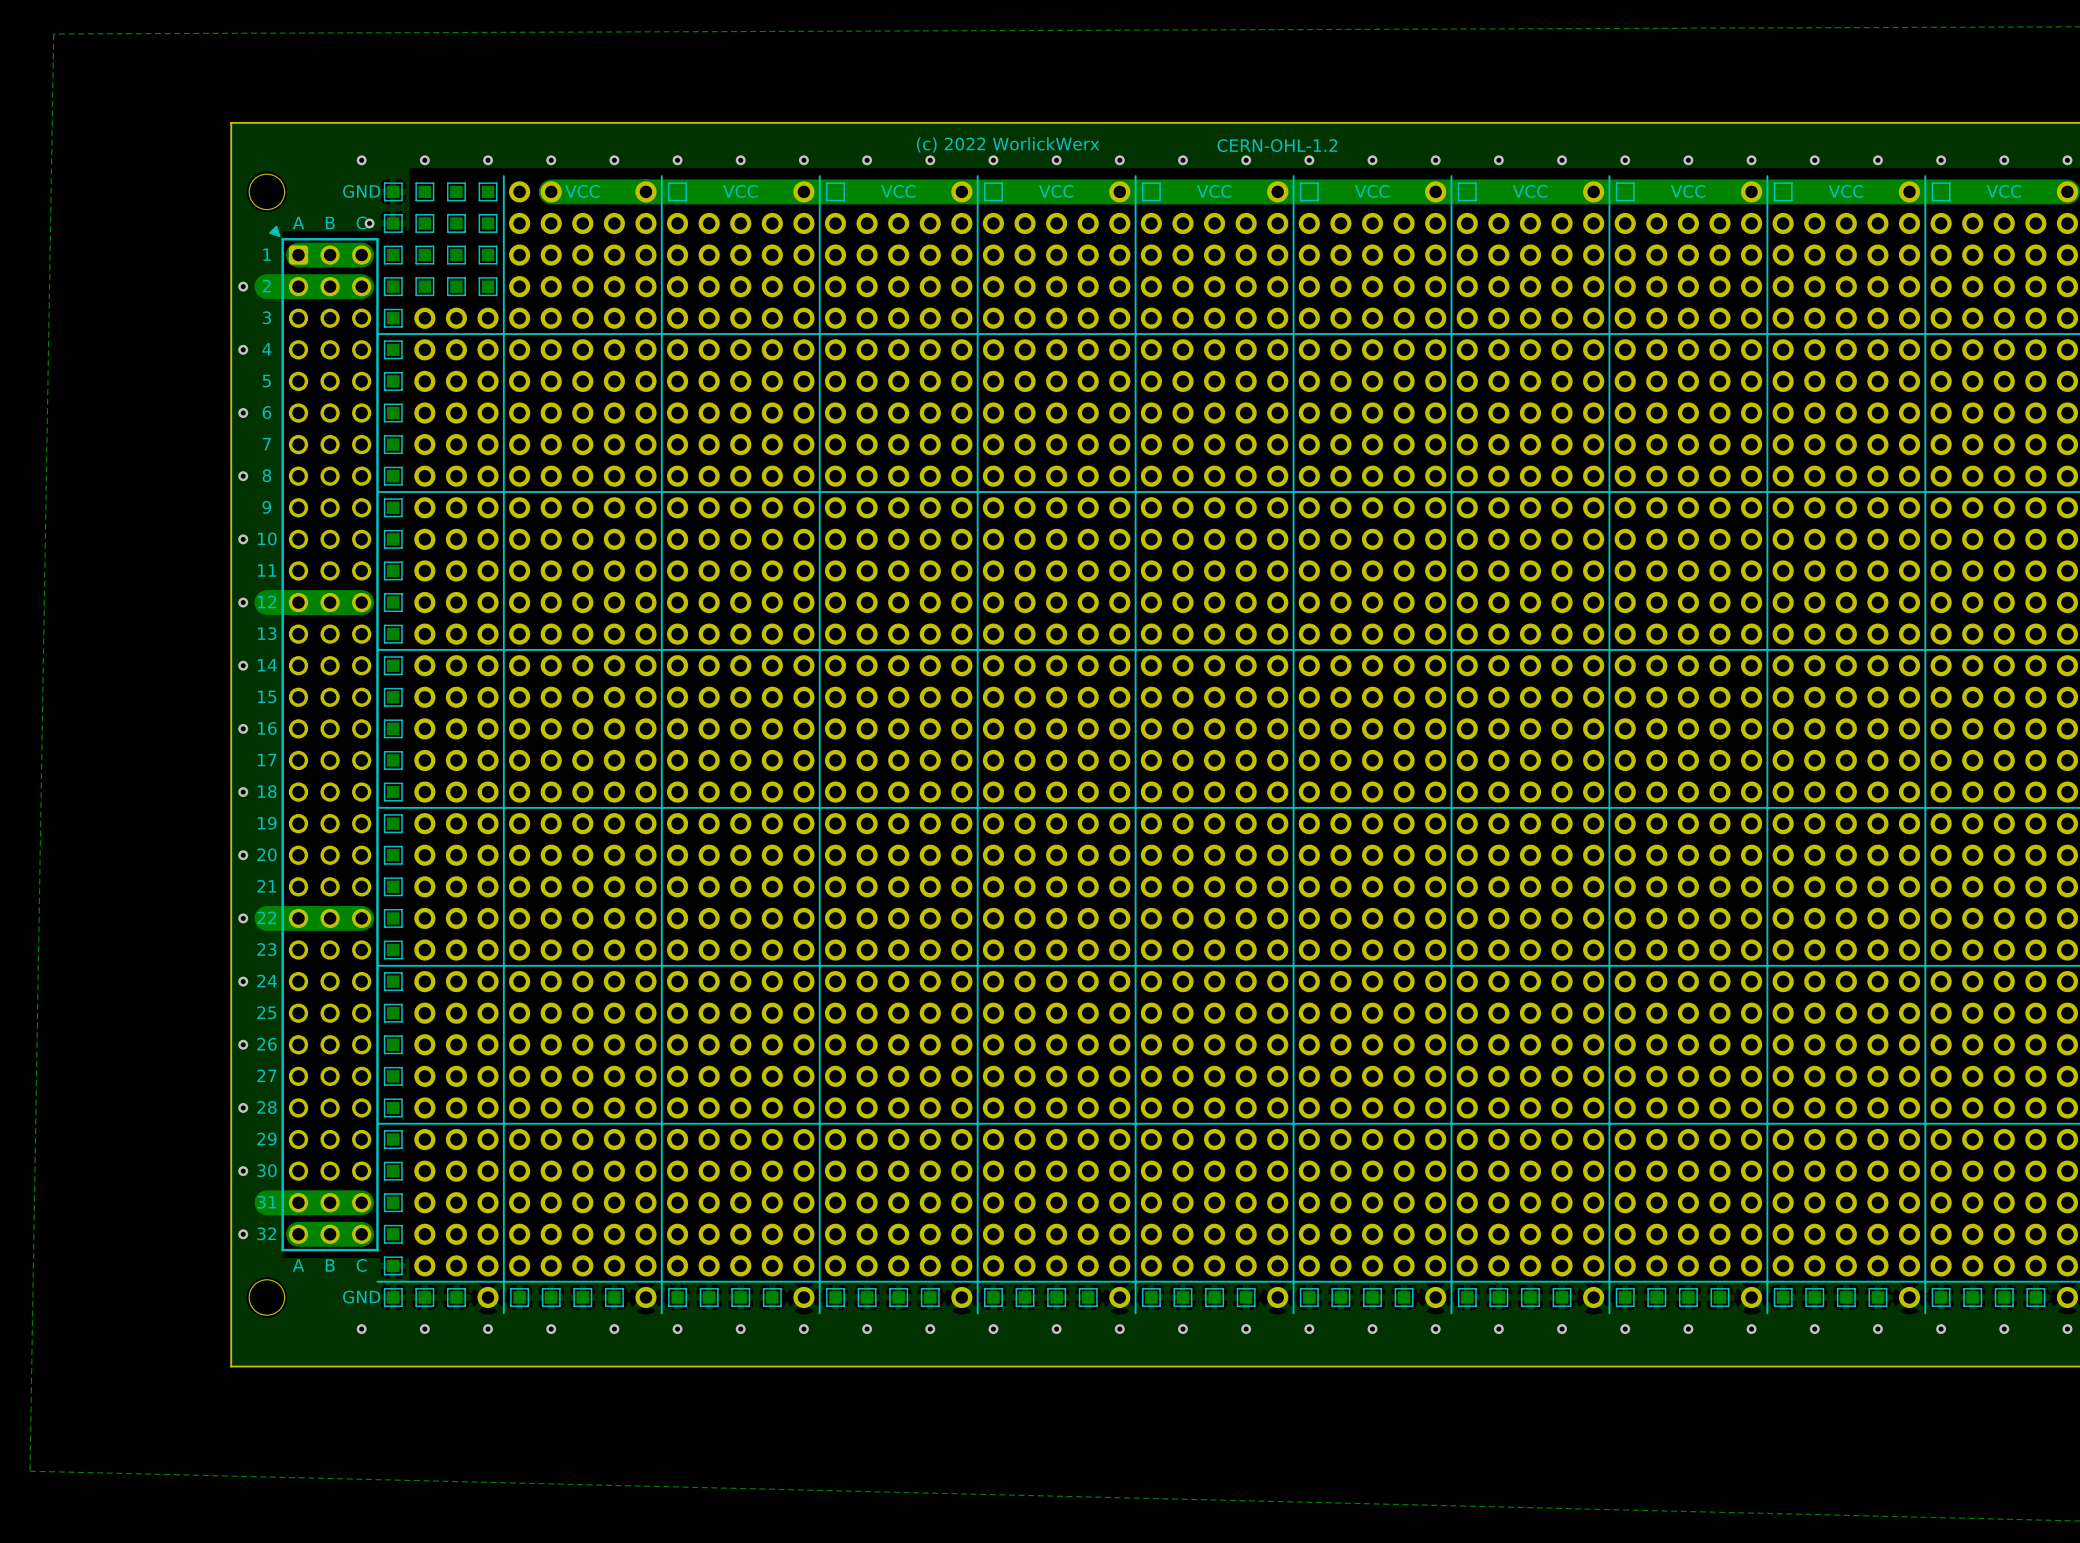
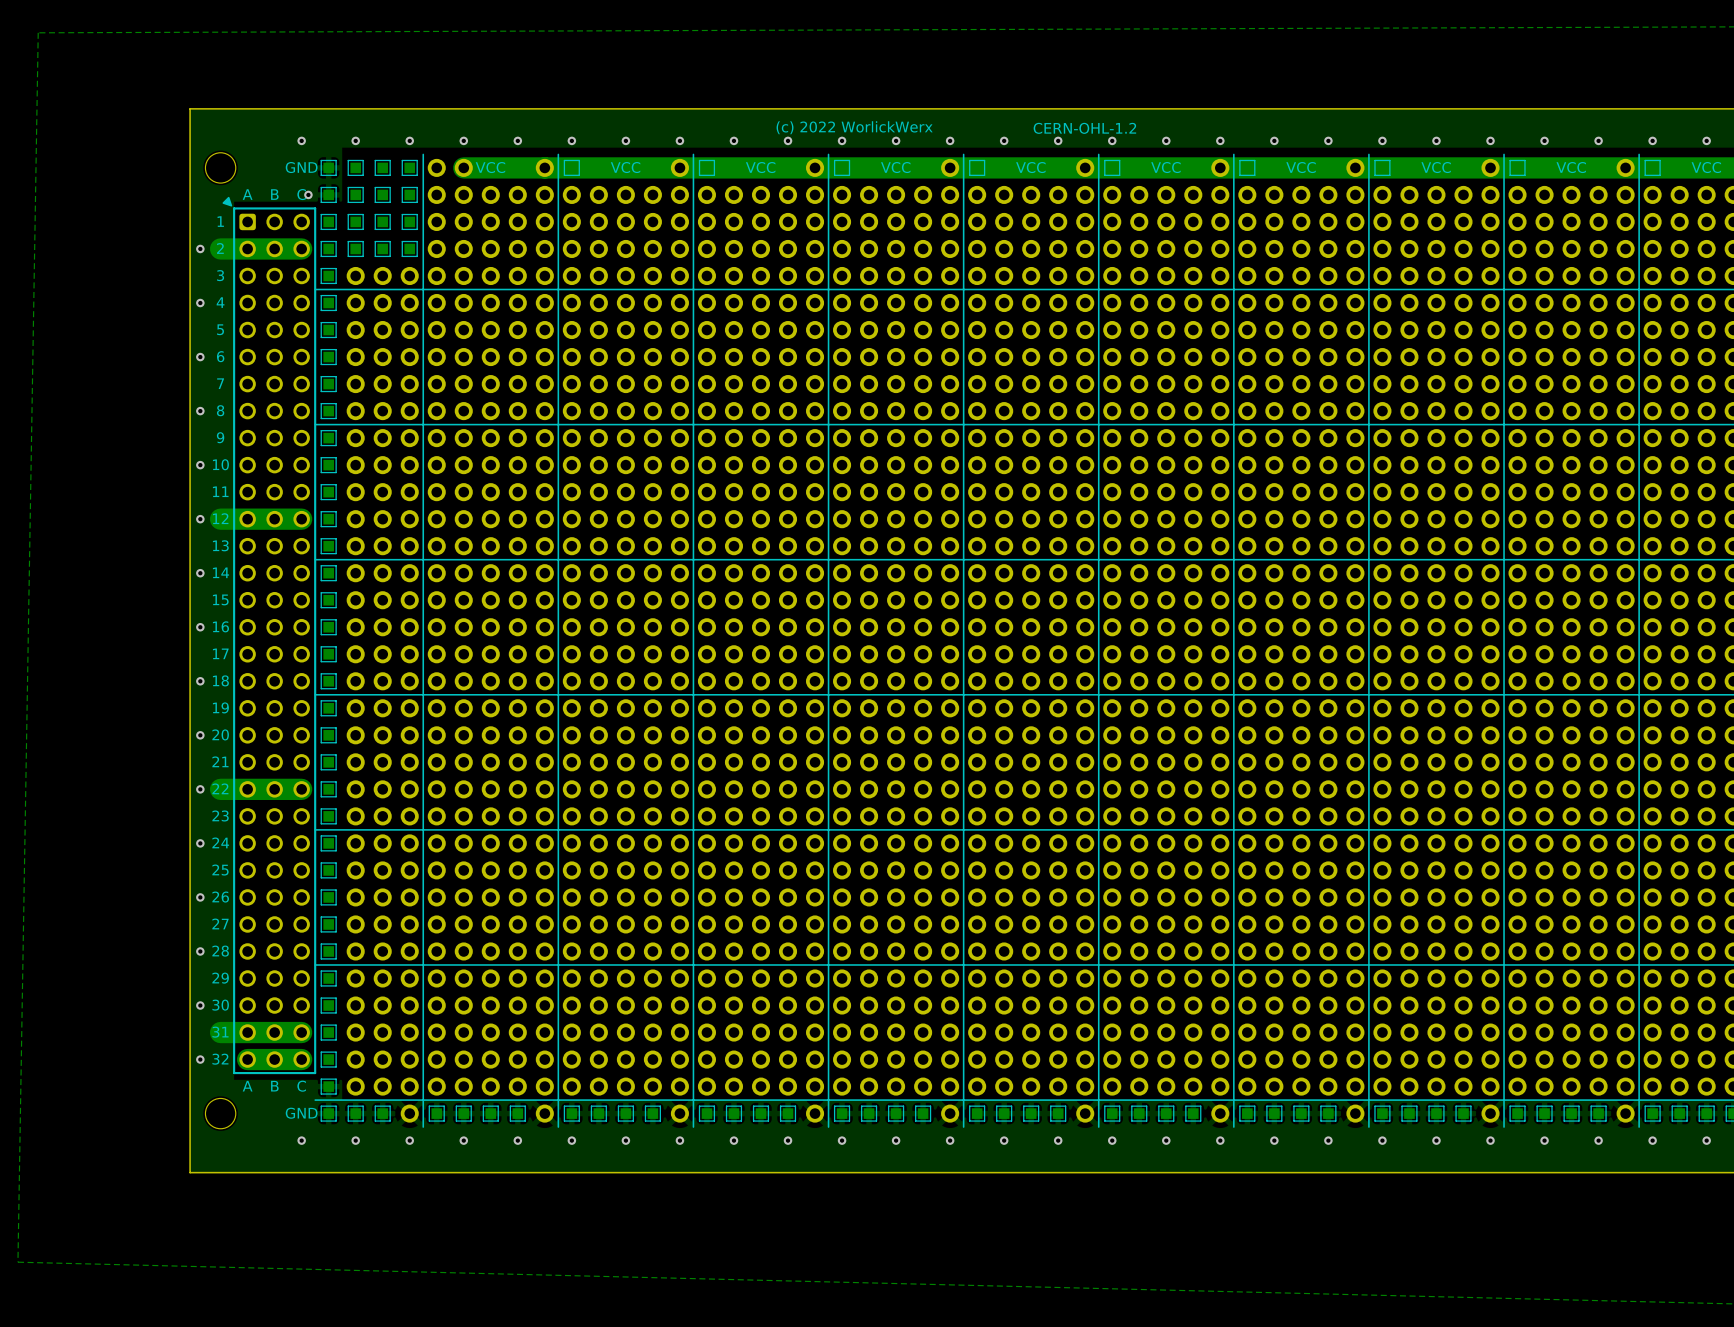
track: (361, 255) (298, 255) -> none

